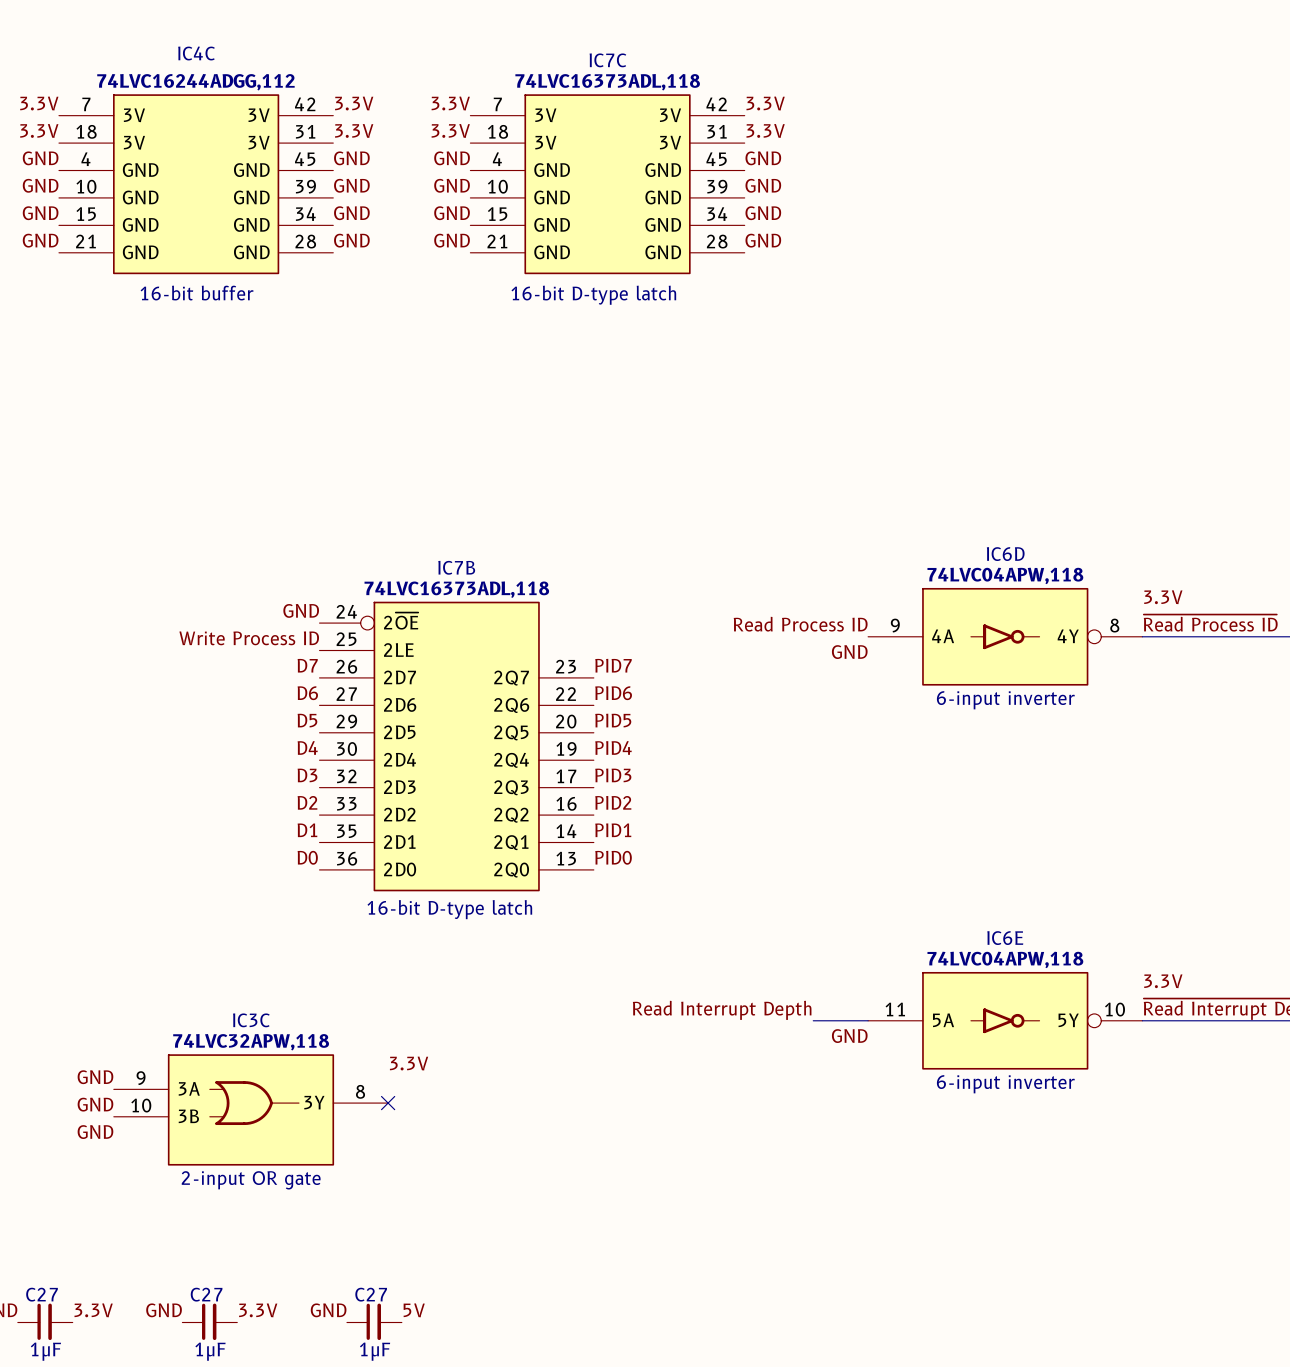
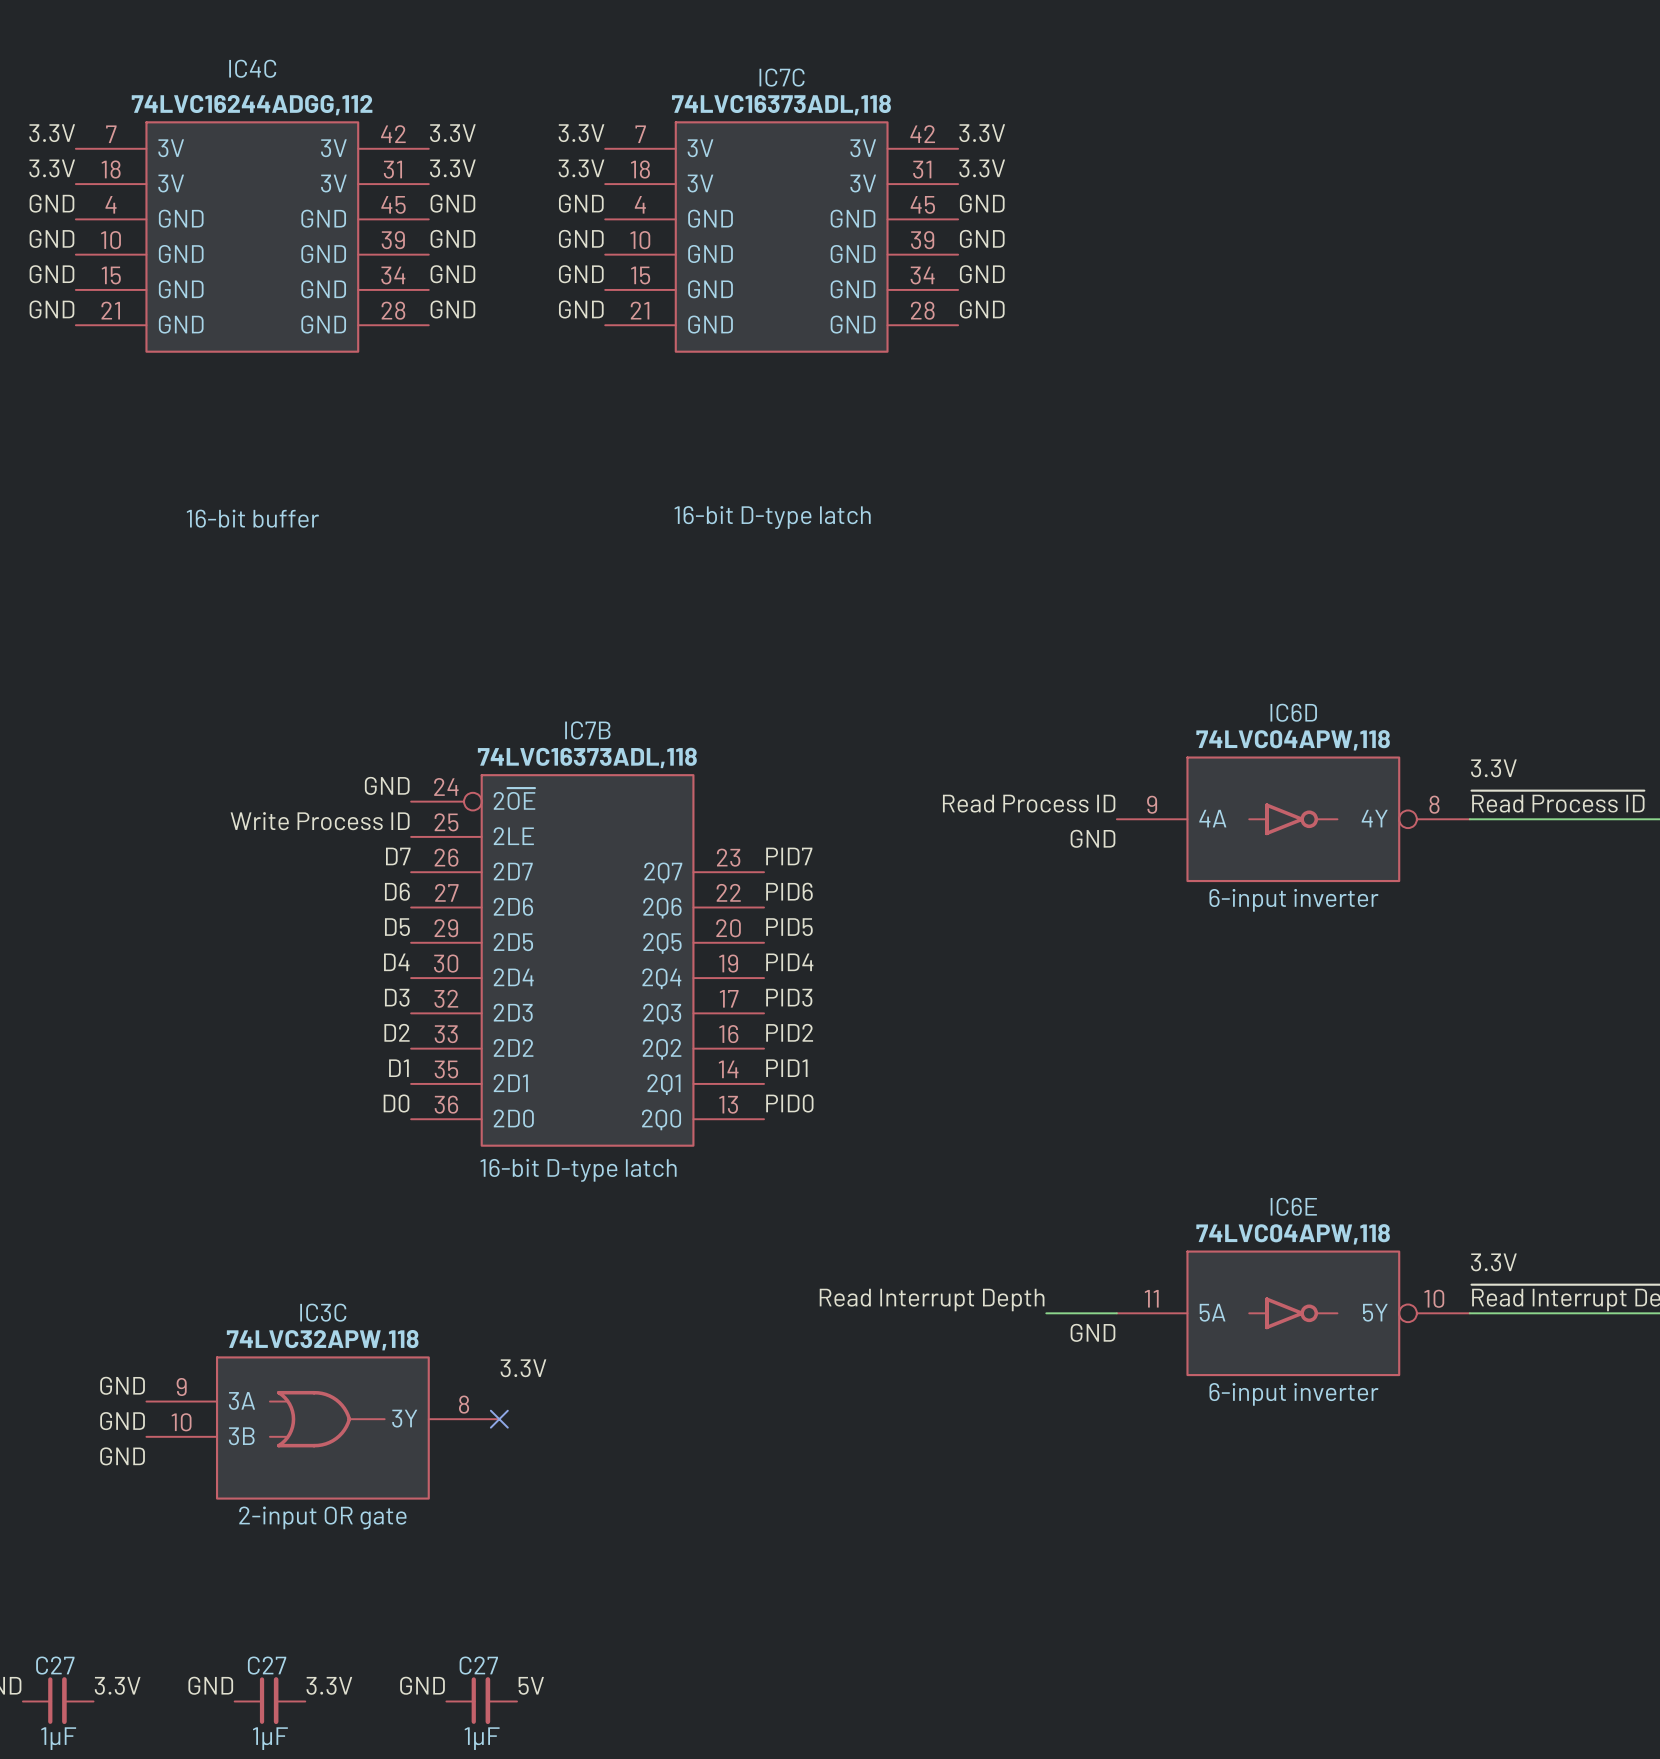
IC4C text position: 16-bit buffer (197, 293) -> 16-bit buffer (252, 518)
IC7C text position: 16-bit D-type latch (593, 295) -> 16-bit D-type latch (772, 517)

